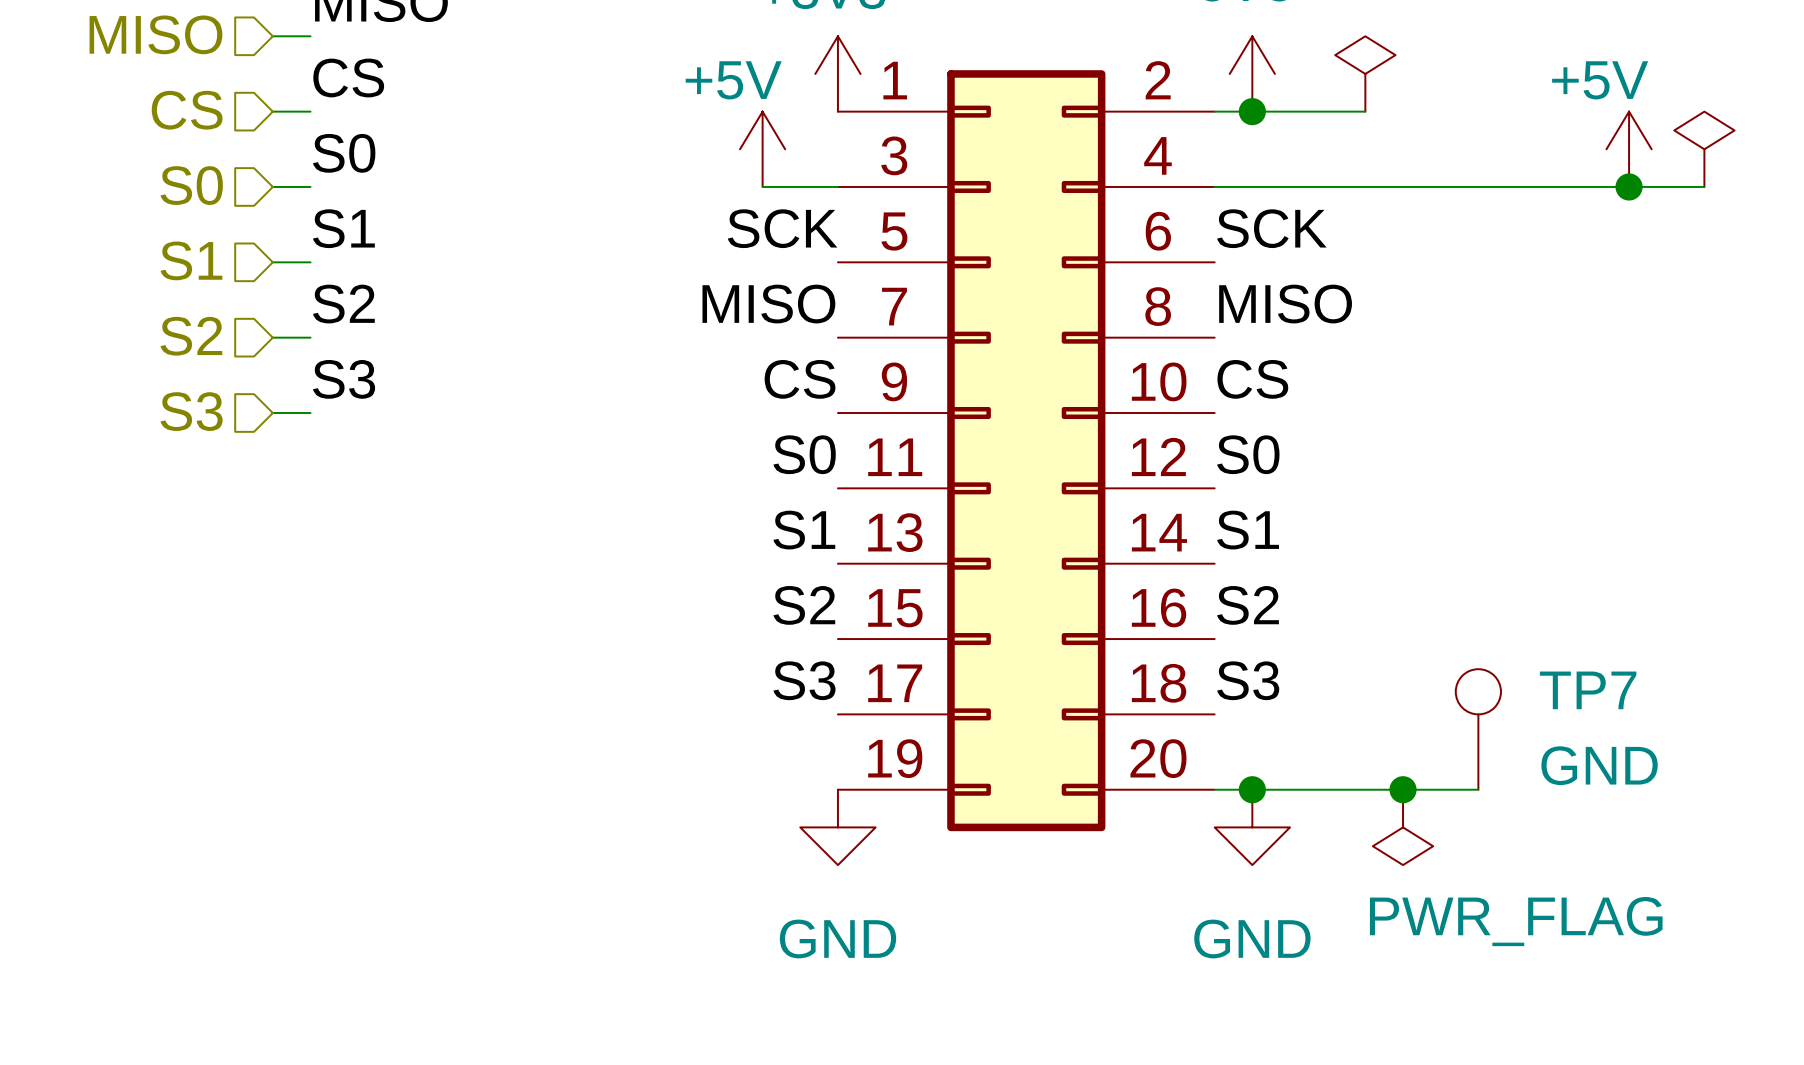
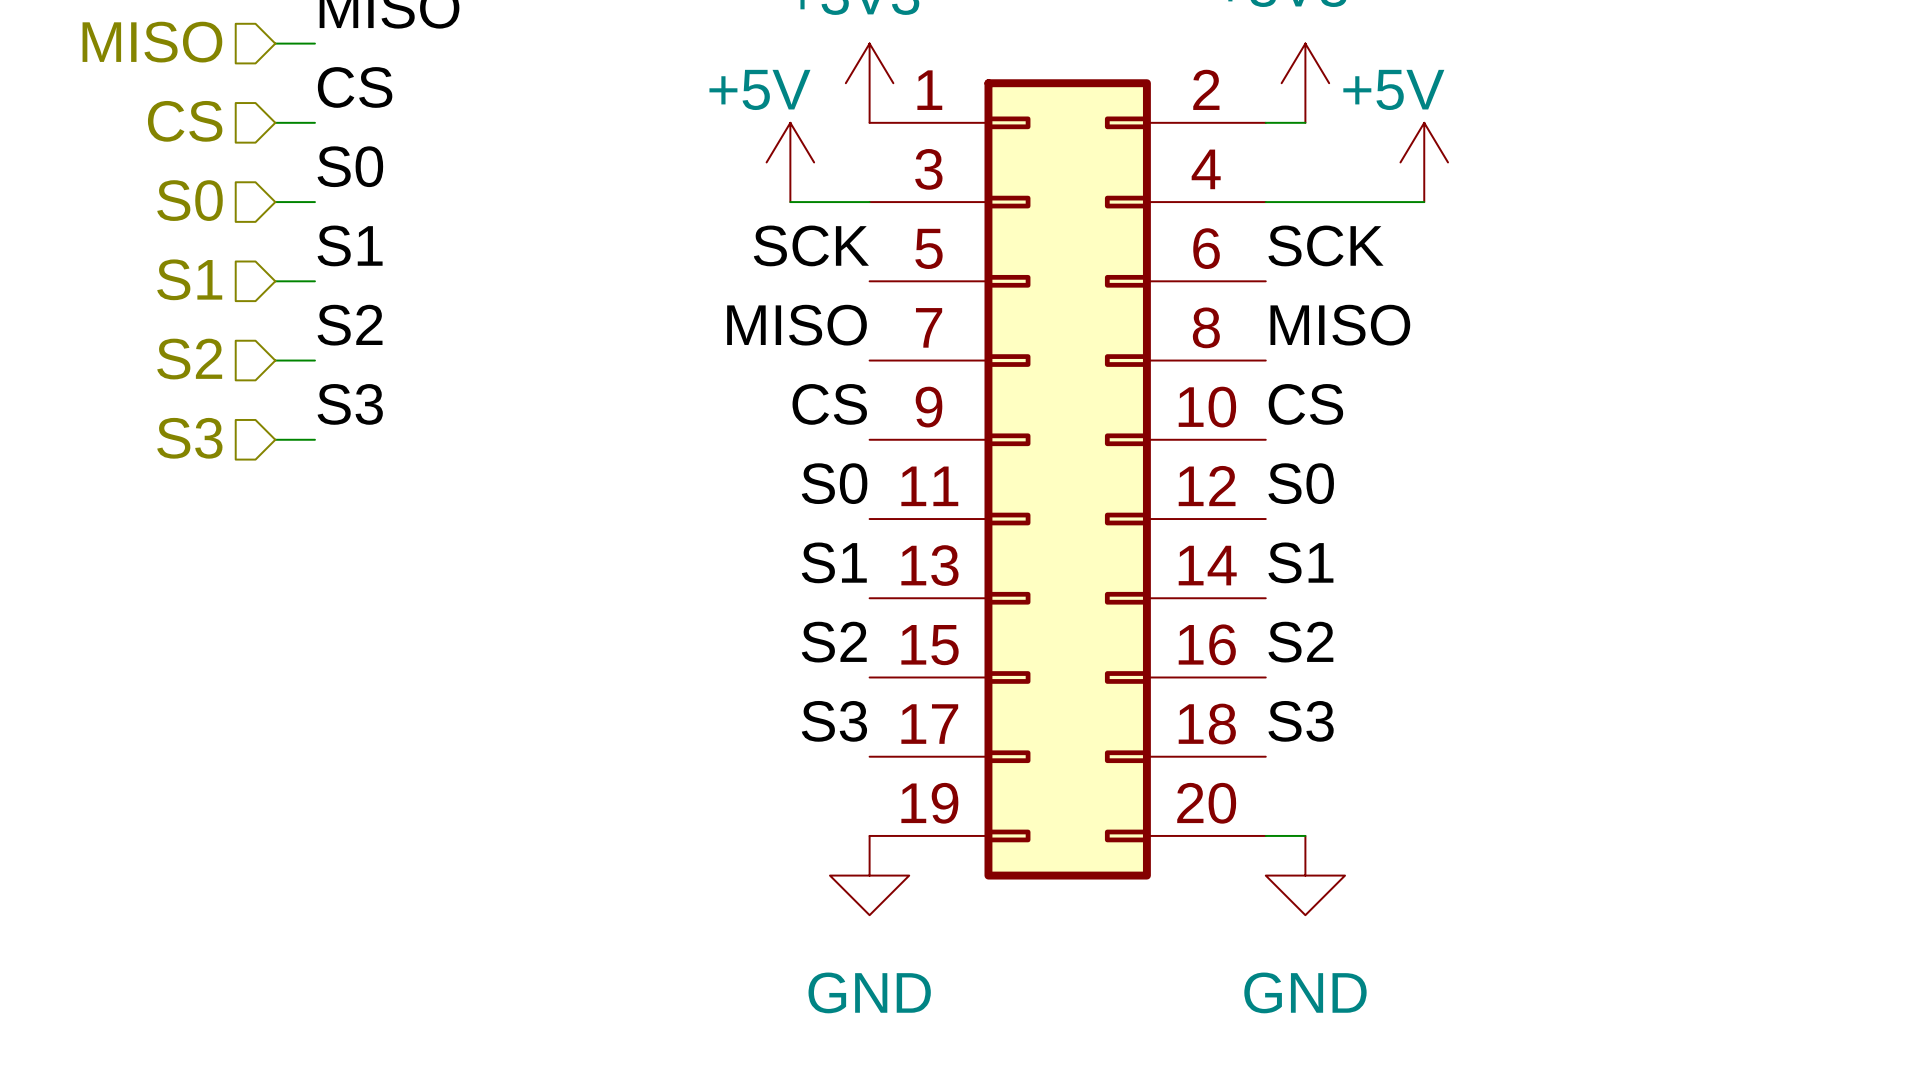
power symbol: (1365, 73) -> none
wire: (1252, 111) (1365, 111) -> none
junction: (1252, 111) -> none
power symbol position: +5V (1629, 149) -> +5V (1424, 162)
power symbol: (1704, 149) -> none
wire: (1365, 186) (1704, 186) -> none
junction: (1629, 186) -> none
TP7: GND (1478, 729) -> none
wire: (1252, 789) (1478, 789) -> none
junction: (1252, 789) -> none
junction: (1403, 789) -> none
power symbol: PWR_FLAG (1403, 827) -> none

